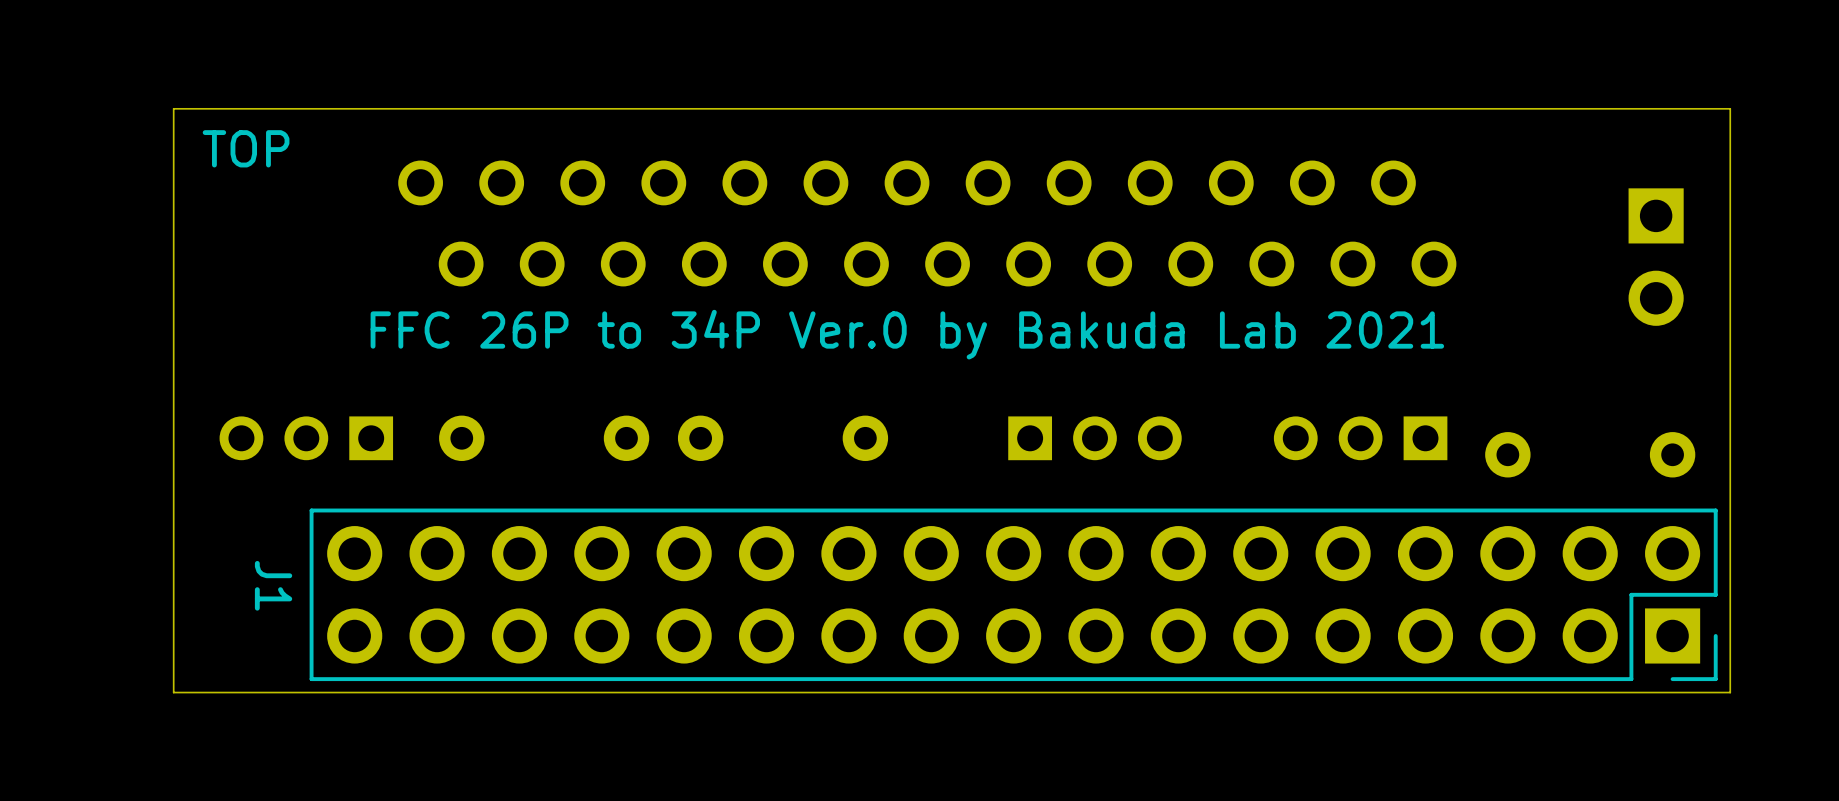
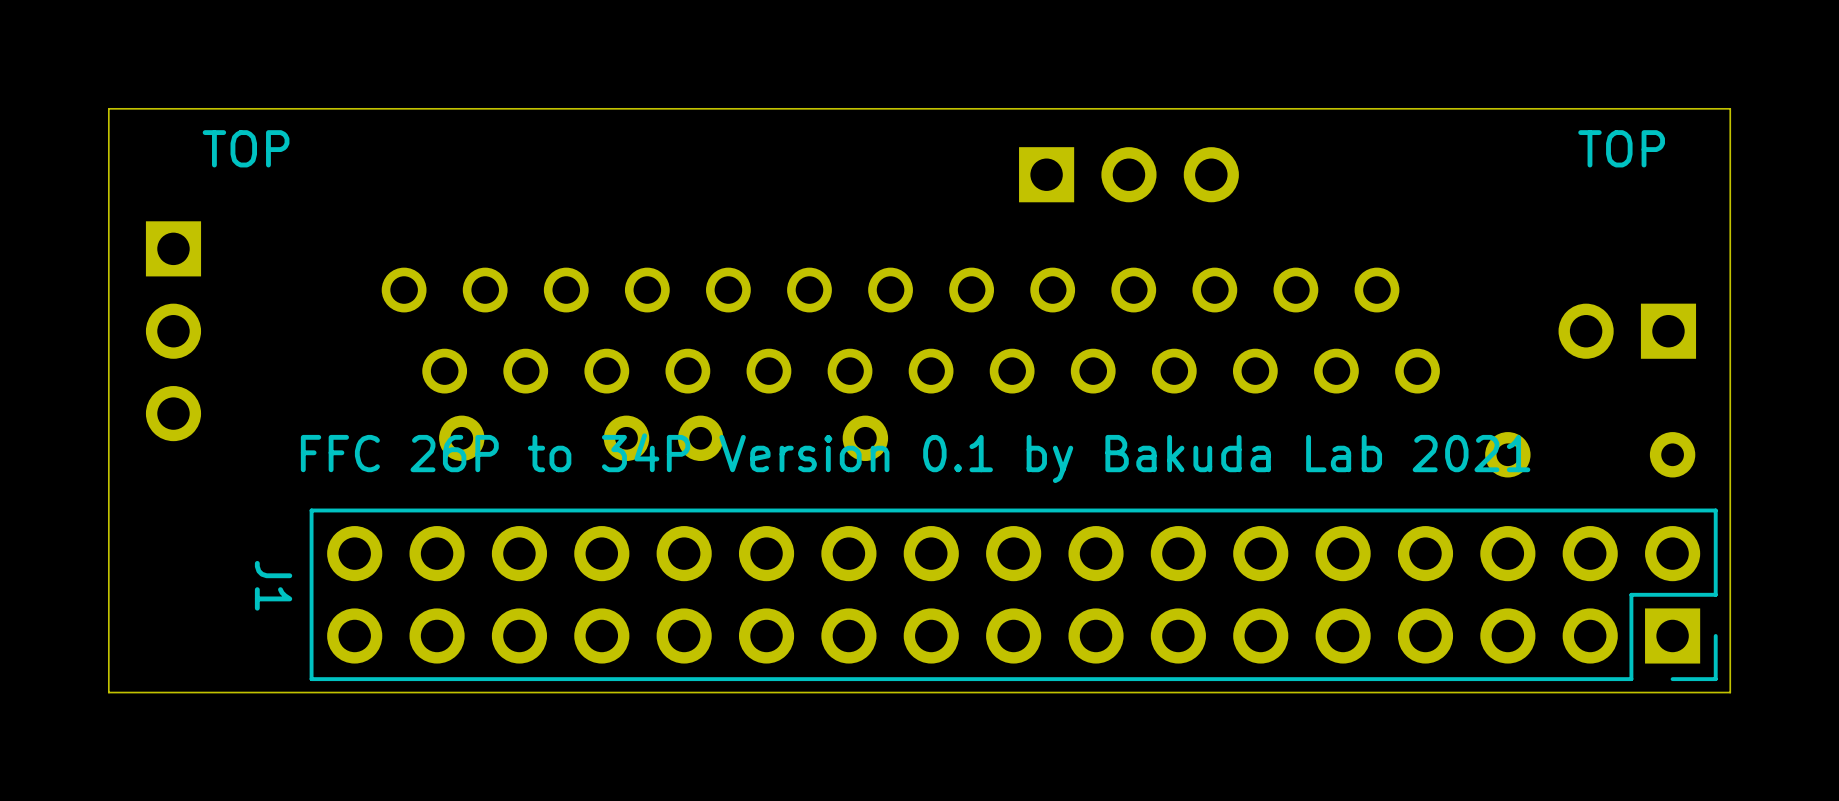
board edge: (173, 108) (173, 692) -> (173, 108) (108, 108) (108, 692) (173, 692)
text: none -> TOP (1621, 148)
part: none -> (1128, 174)
part position: (927, 223) -> (910, 330)
part rotation: 0° (1656, 257) -> 90° clockwise (1627, 331)
part: none -> (173, 331)
text: FFC 26P to 34P Ver.0 by Bakuda Lab 2021 (907, 334) -> none
part: (306, 438) -> none
part: (1094, 438) -> none
part: (1360, 438) -> none
text: none -> FFC 26P to 34P Version 0.1 by Bakuda Lab 2021 (915, 458)

